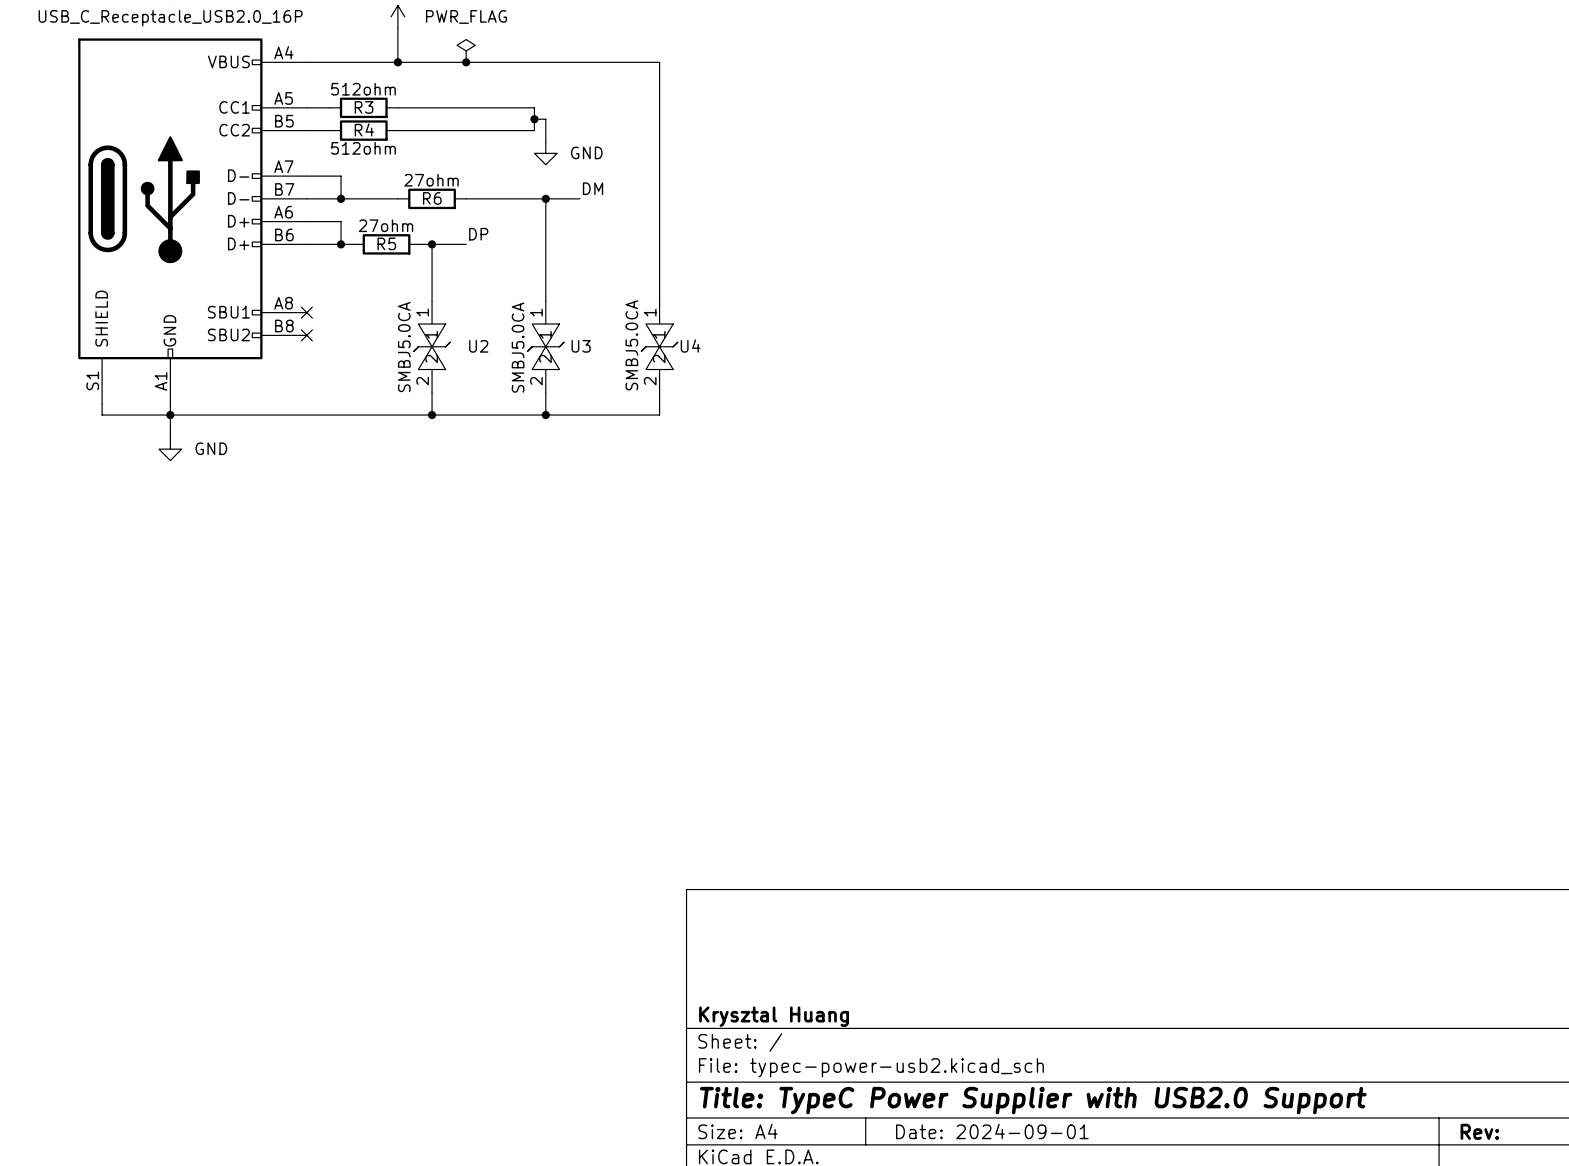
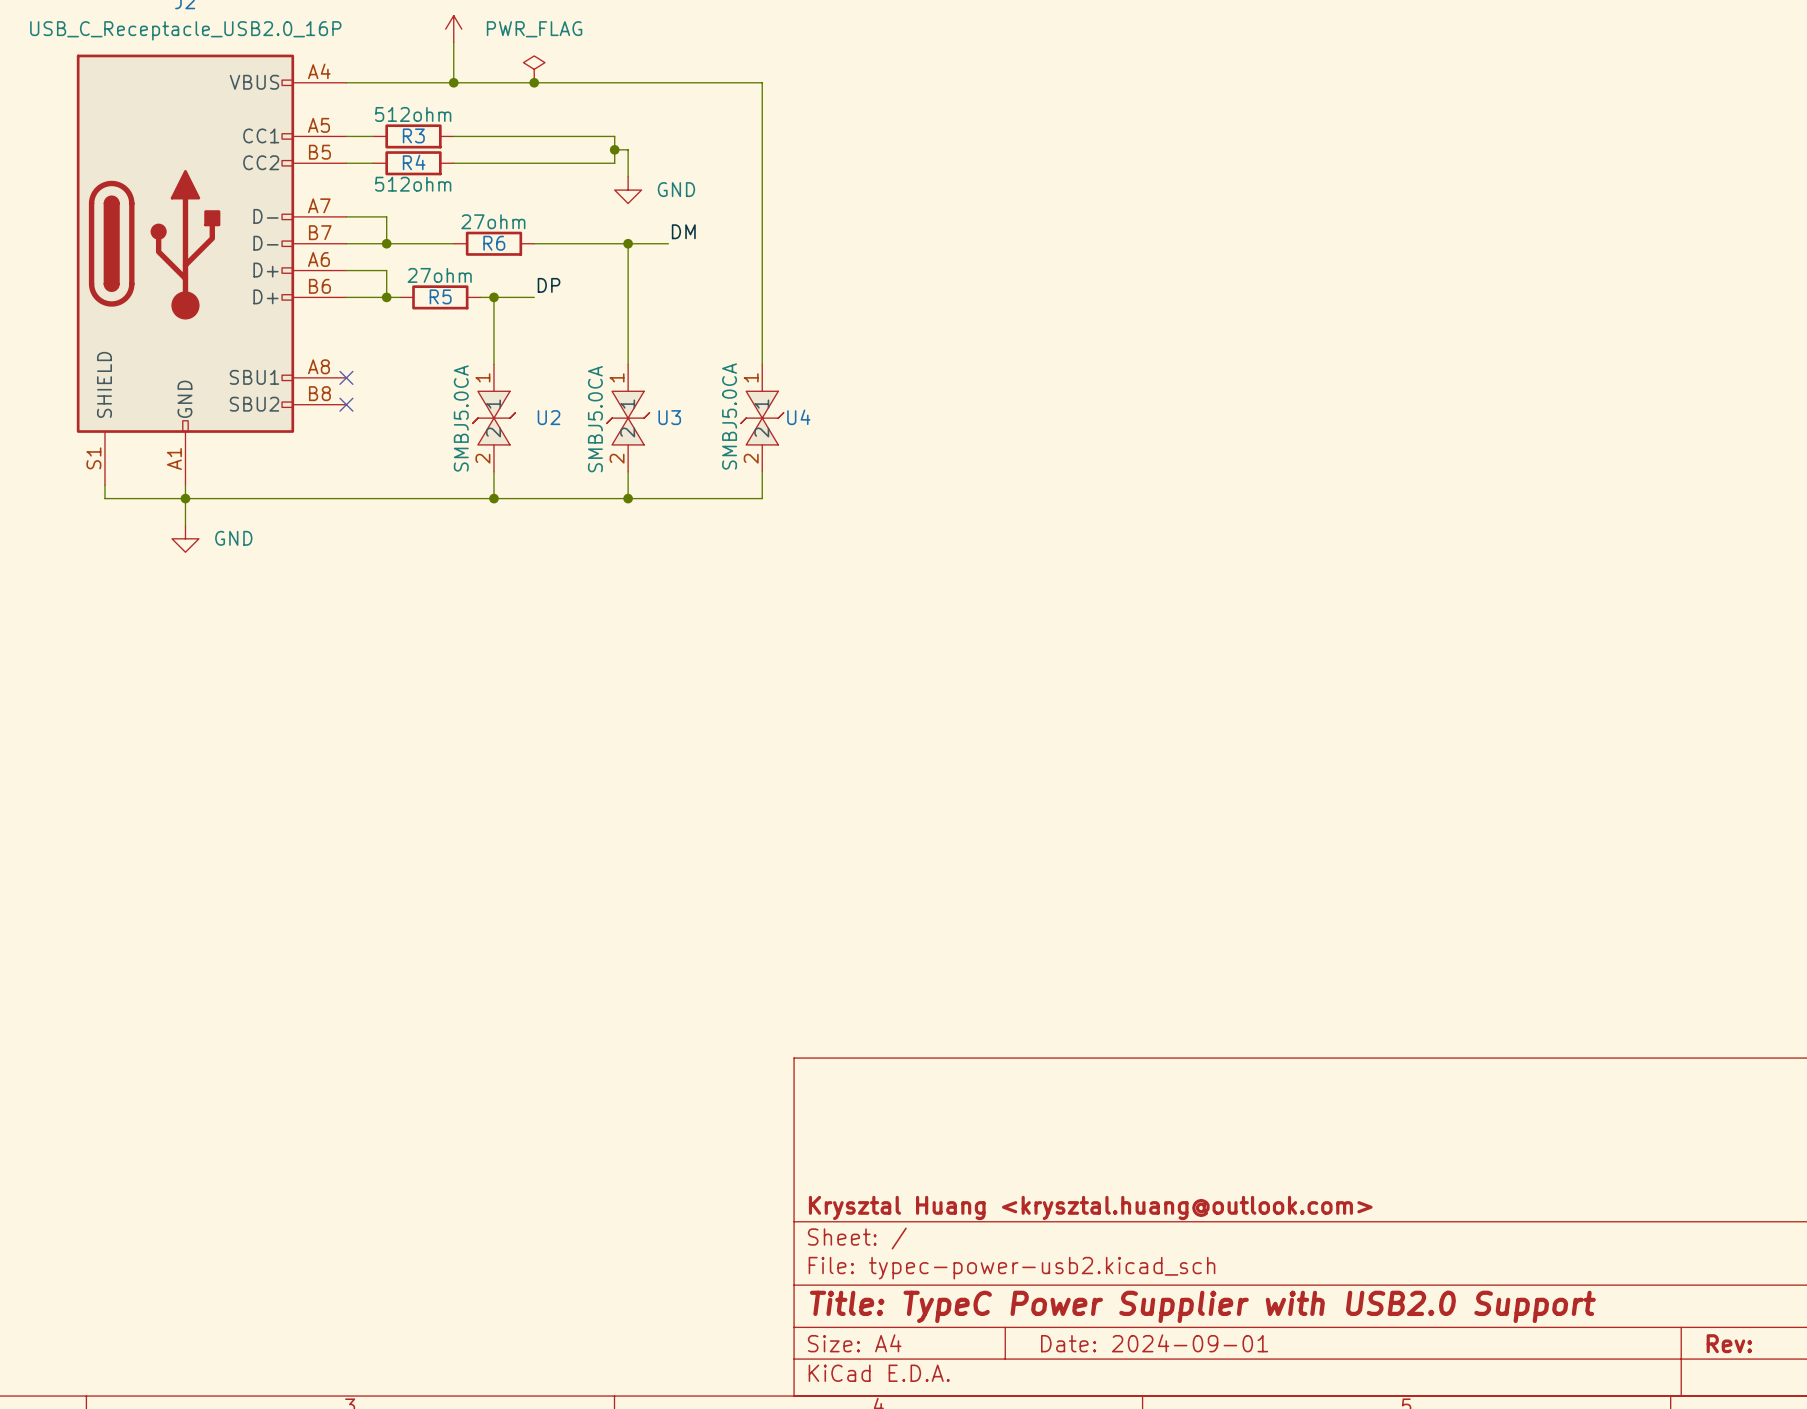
title block: Krysztal Huang (774, 1016) -> Krysztal Huang <krysztal.huang@outlook.com> (1090, 1207)

